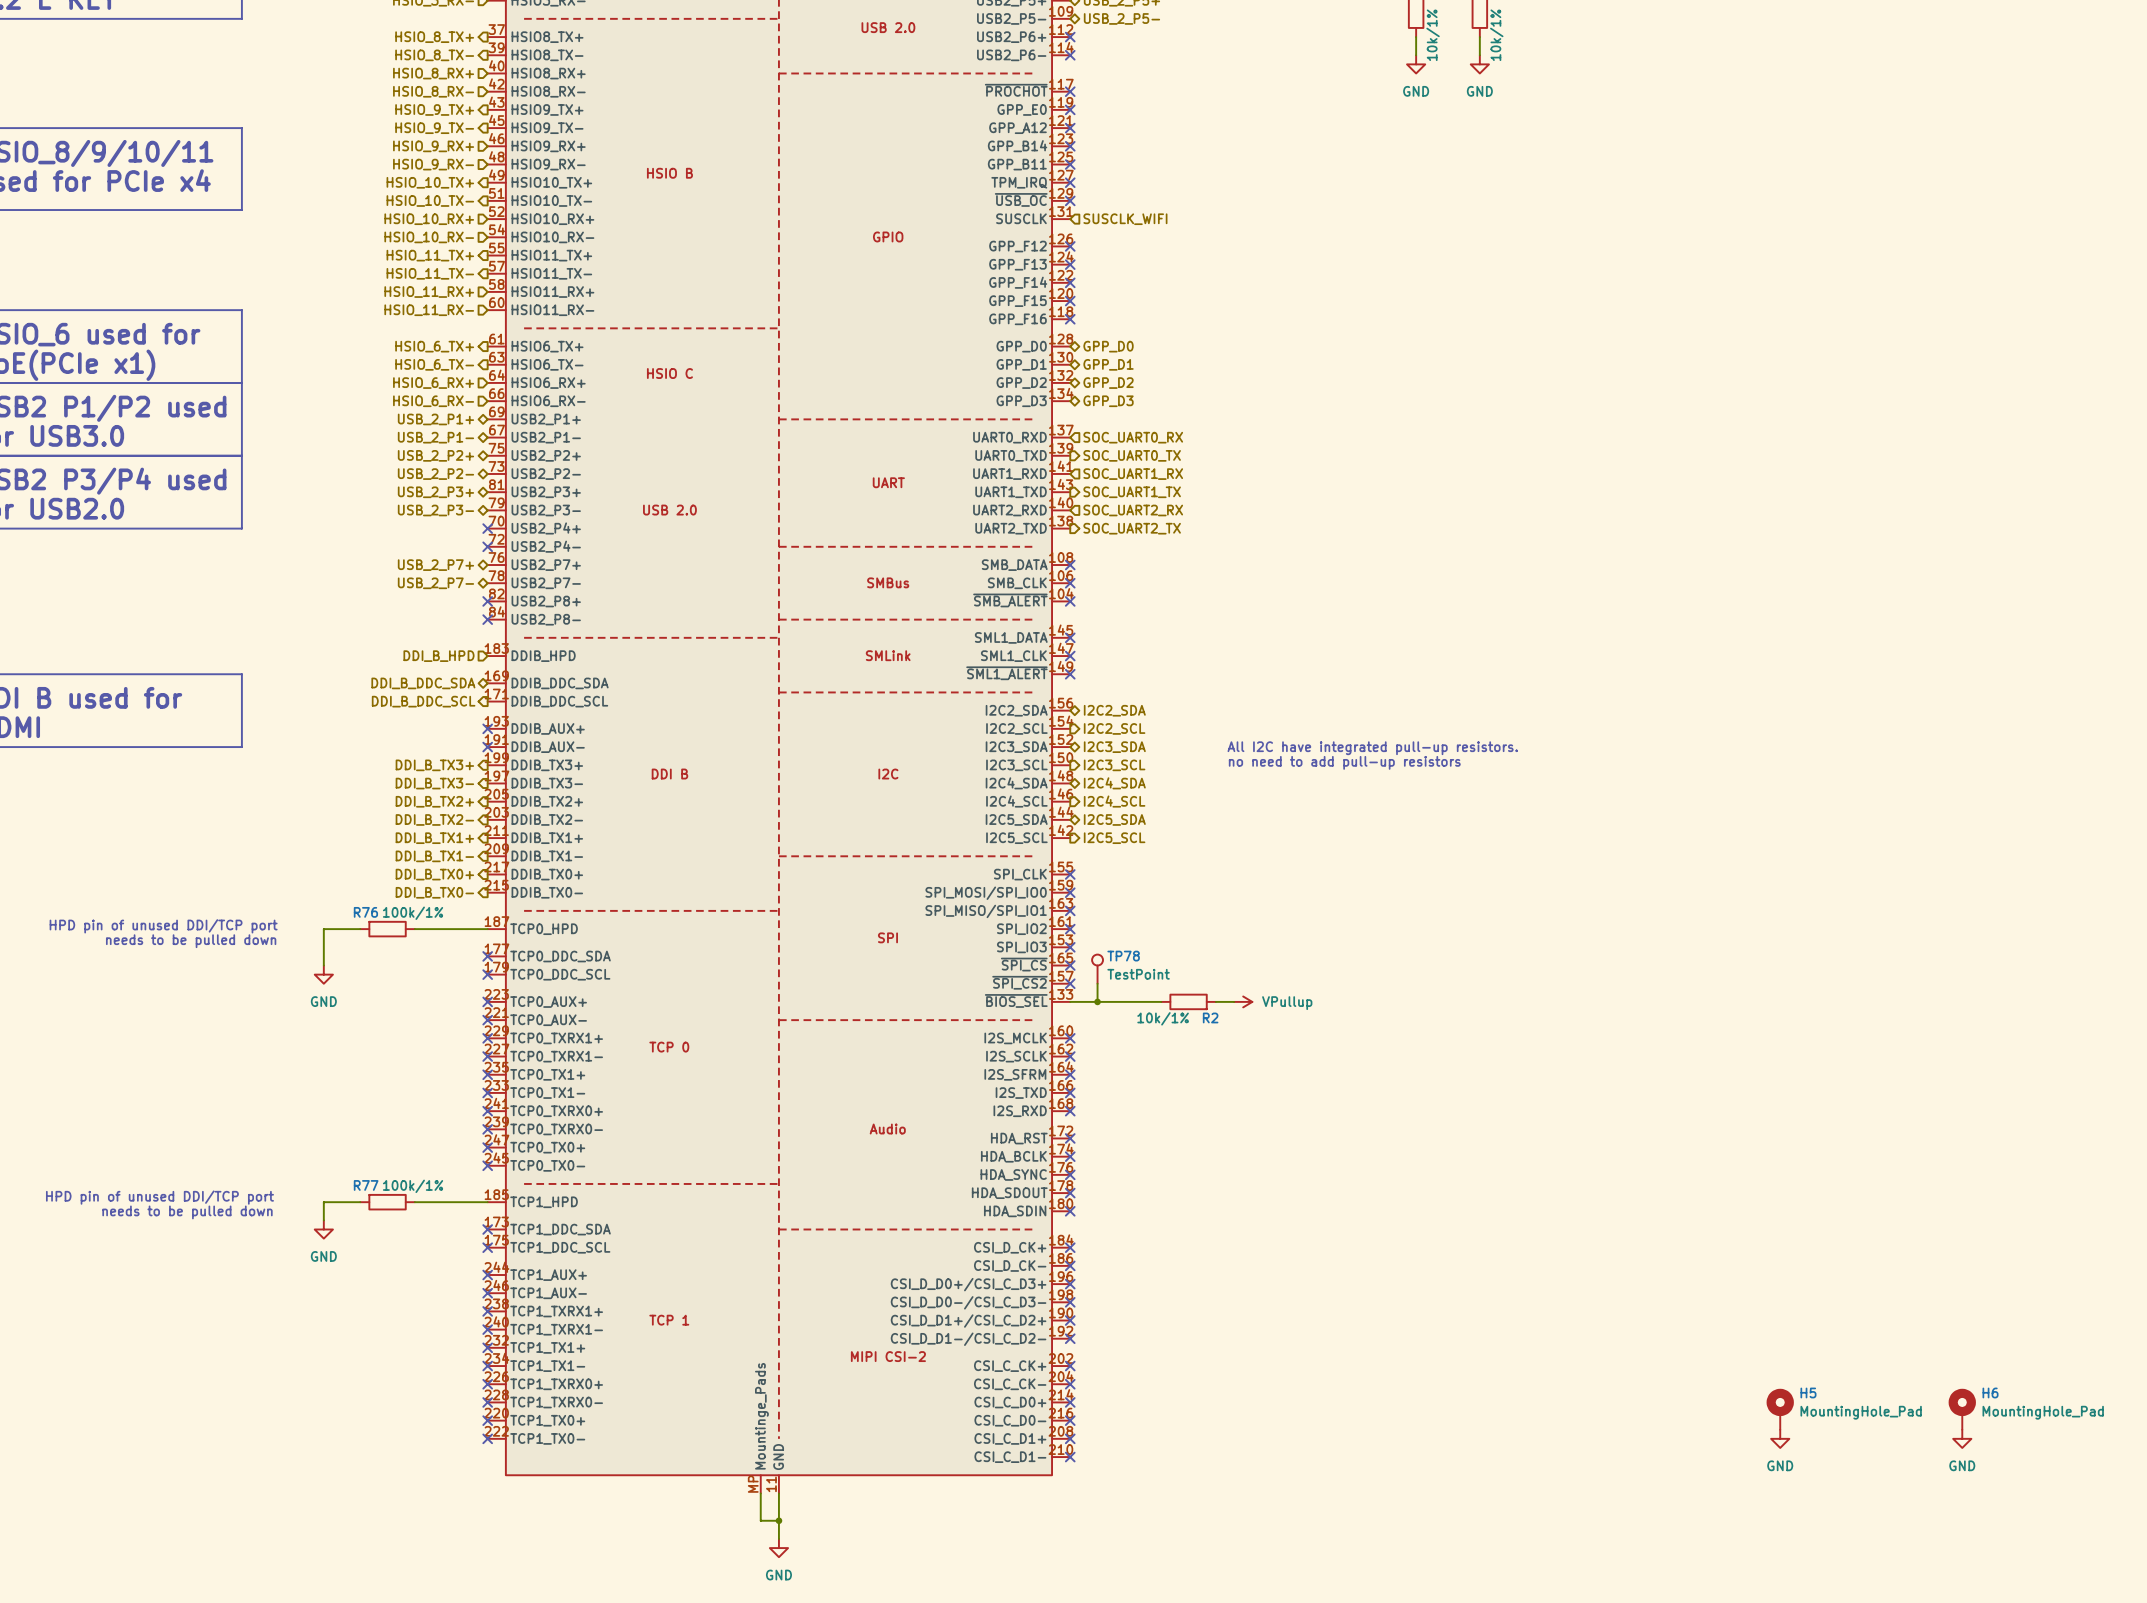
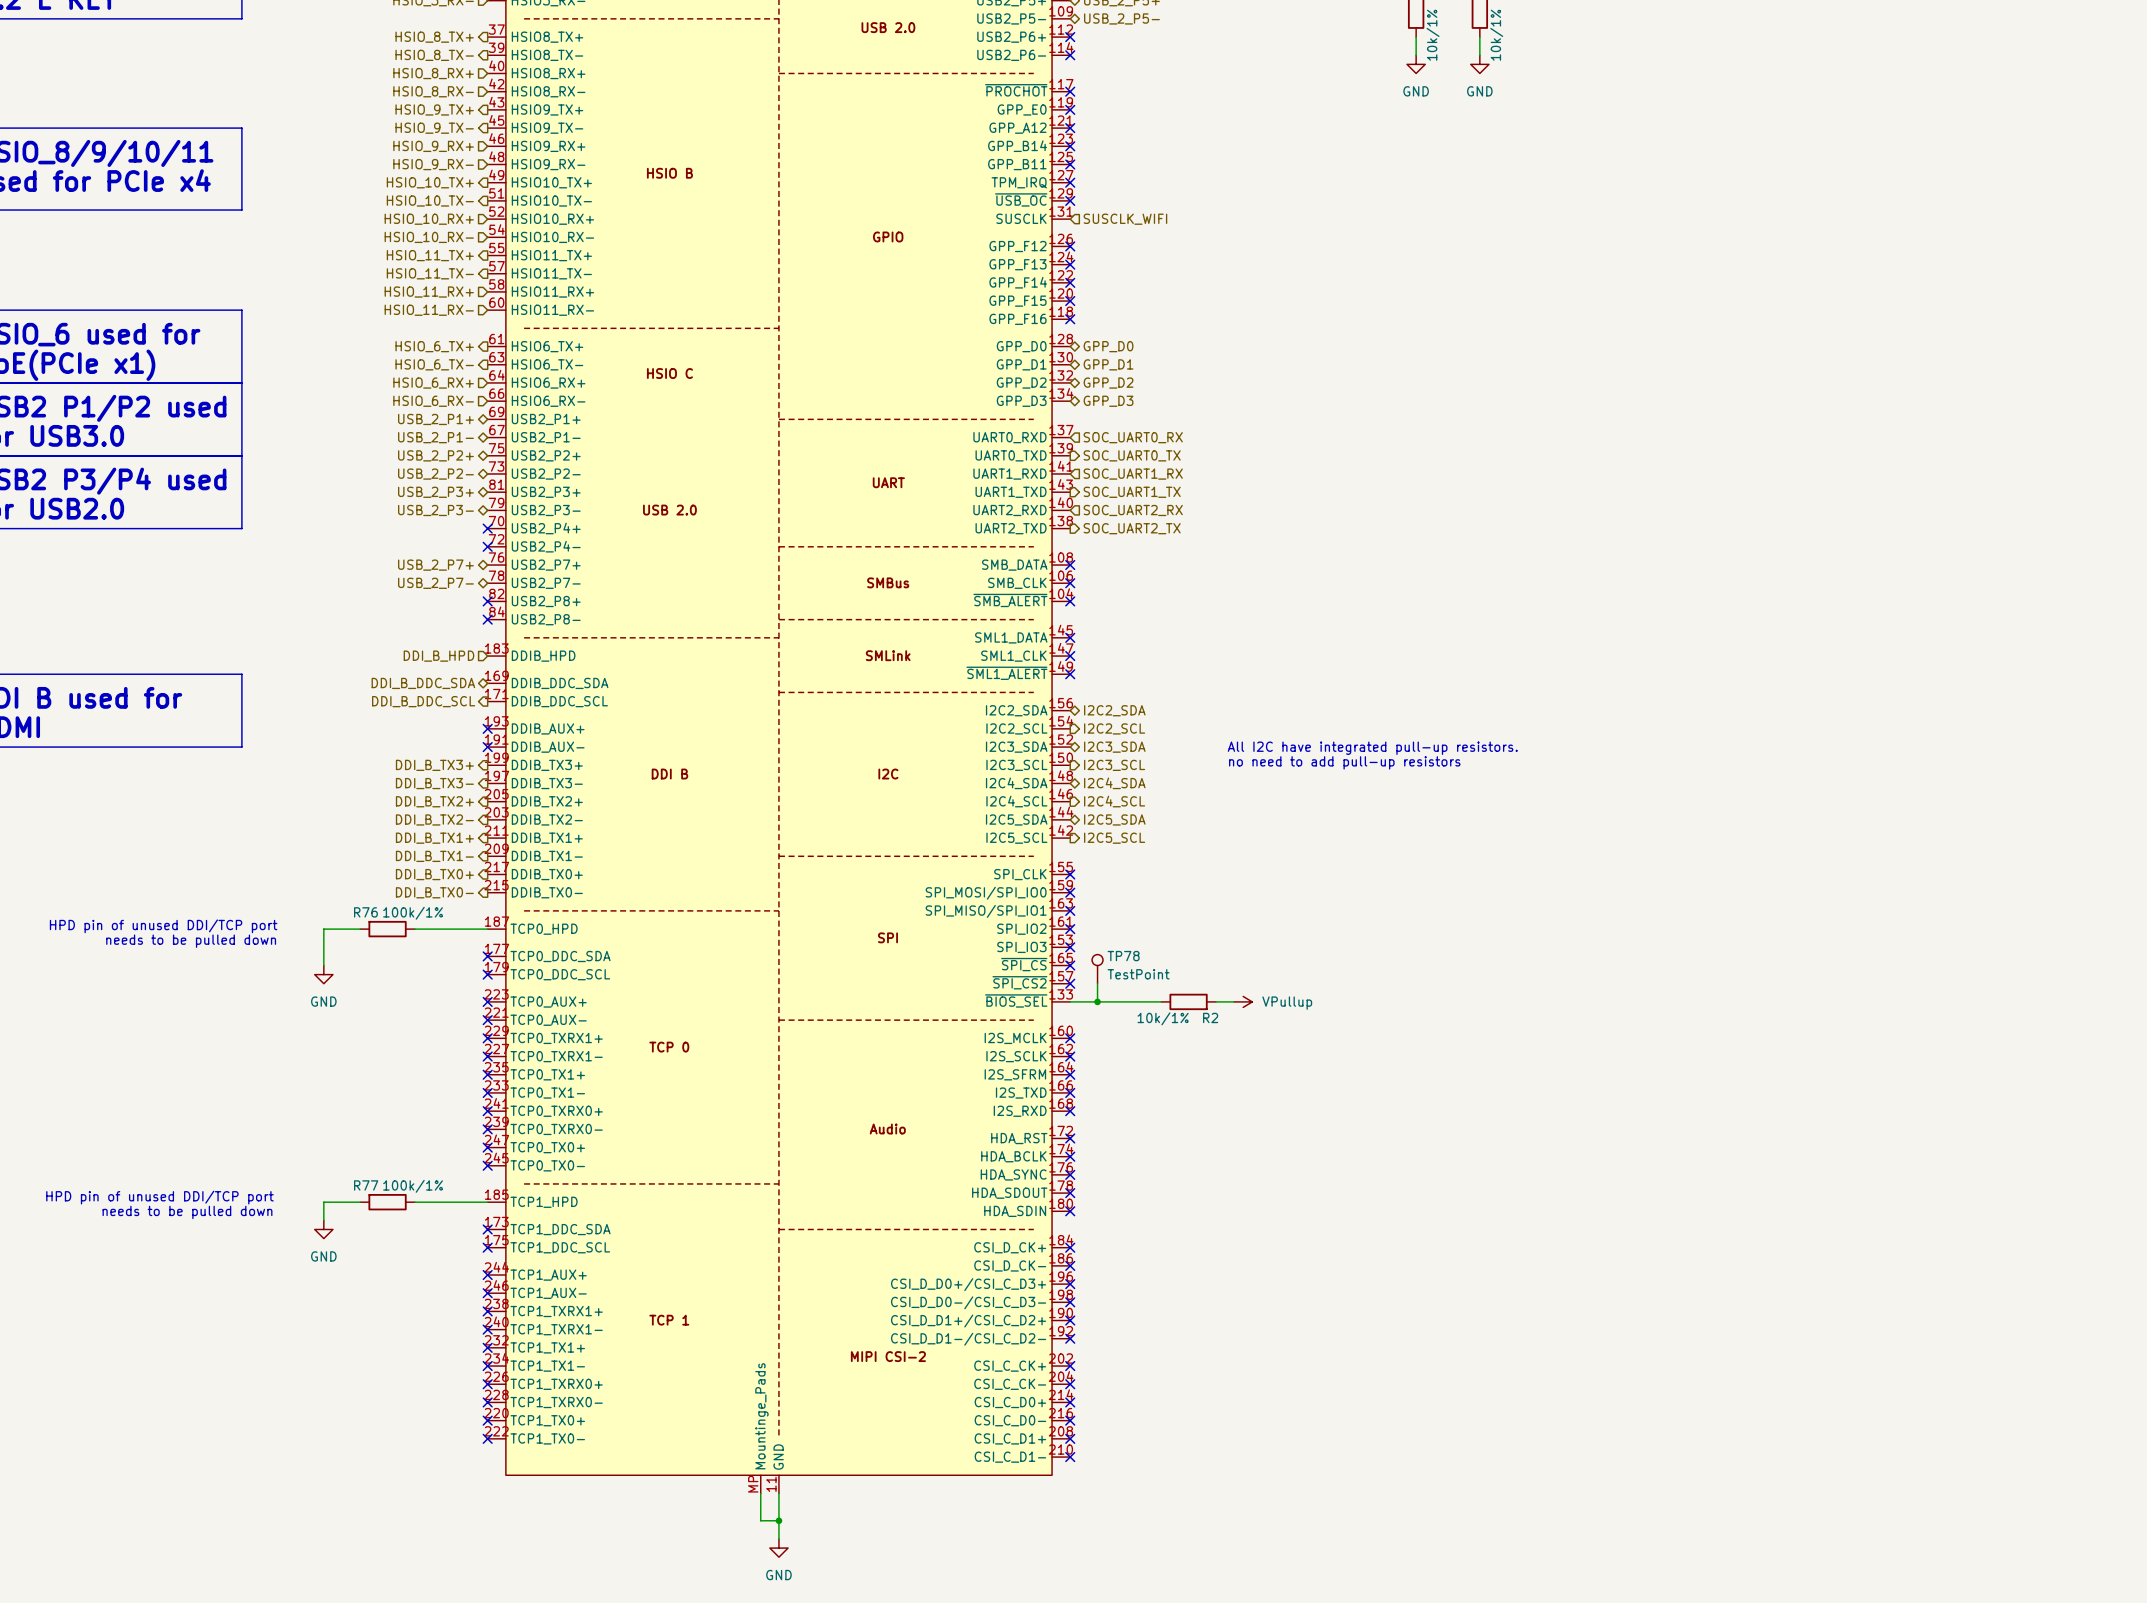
H5: MountingHole_Pad (1780, 1409) -> none
H6: MountingHole_Pad (1962, 1409) -> none
power symbol: GND (1780, 1438) -> none
power symbol: GND (1962, 1438) -> none

